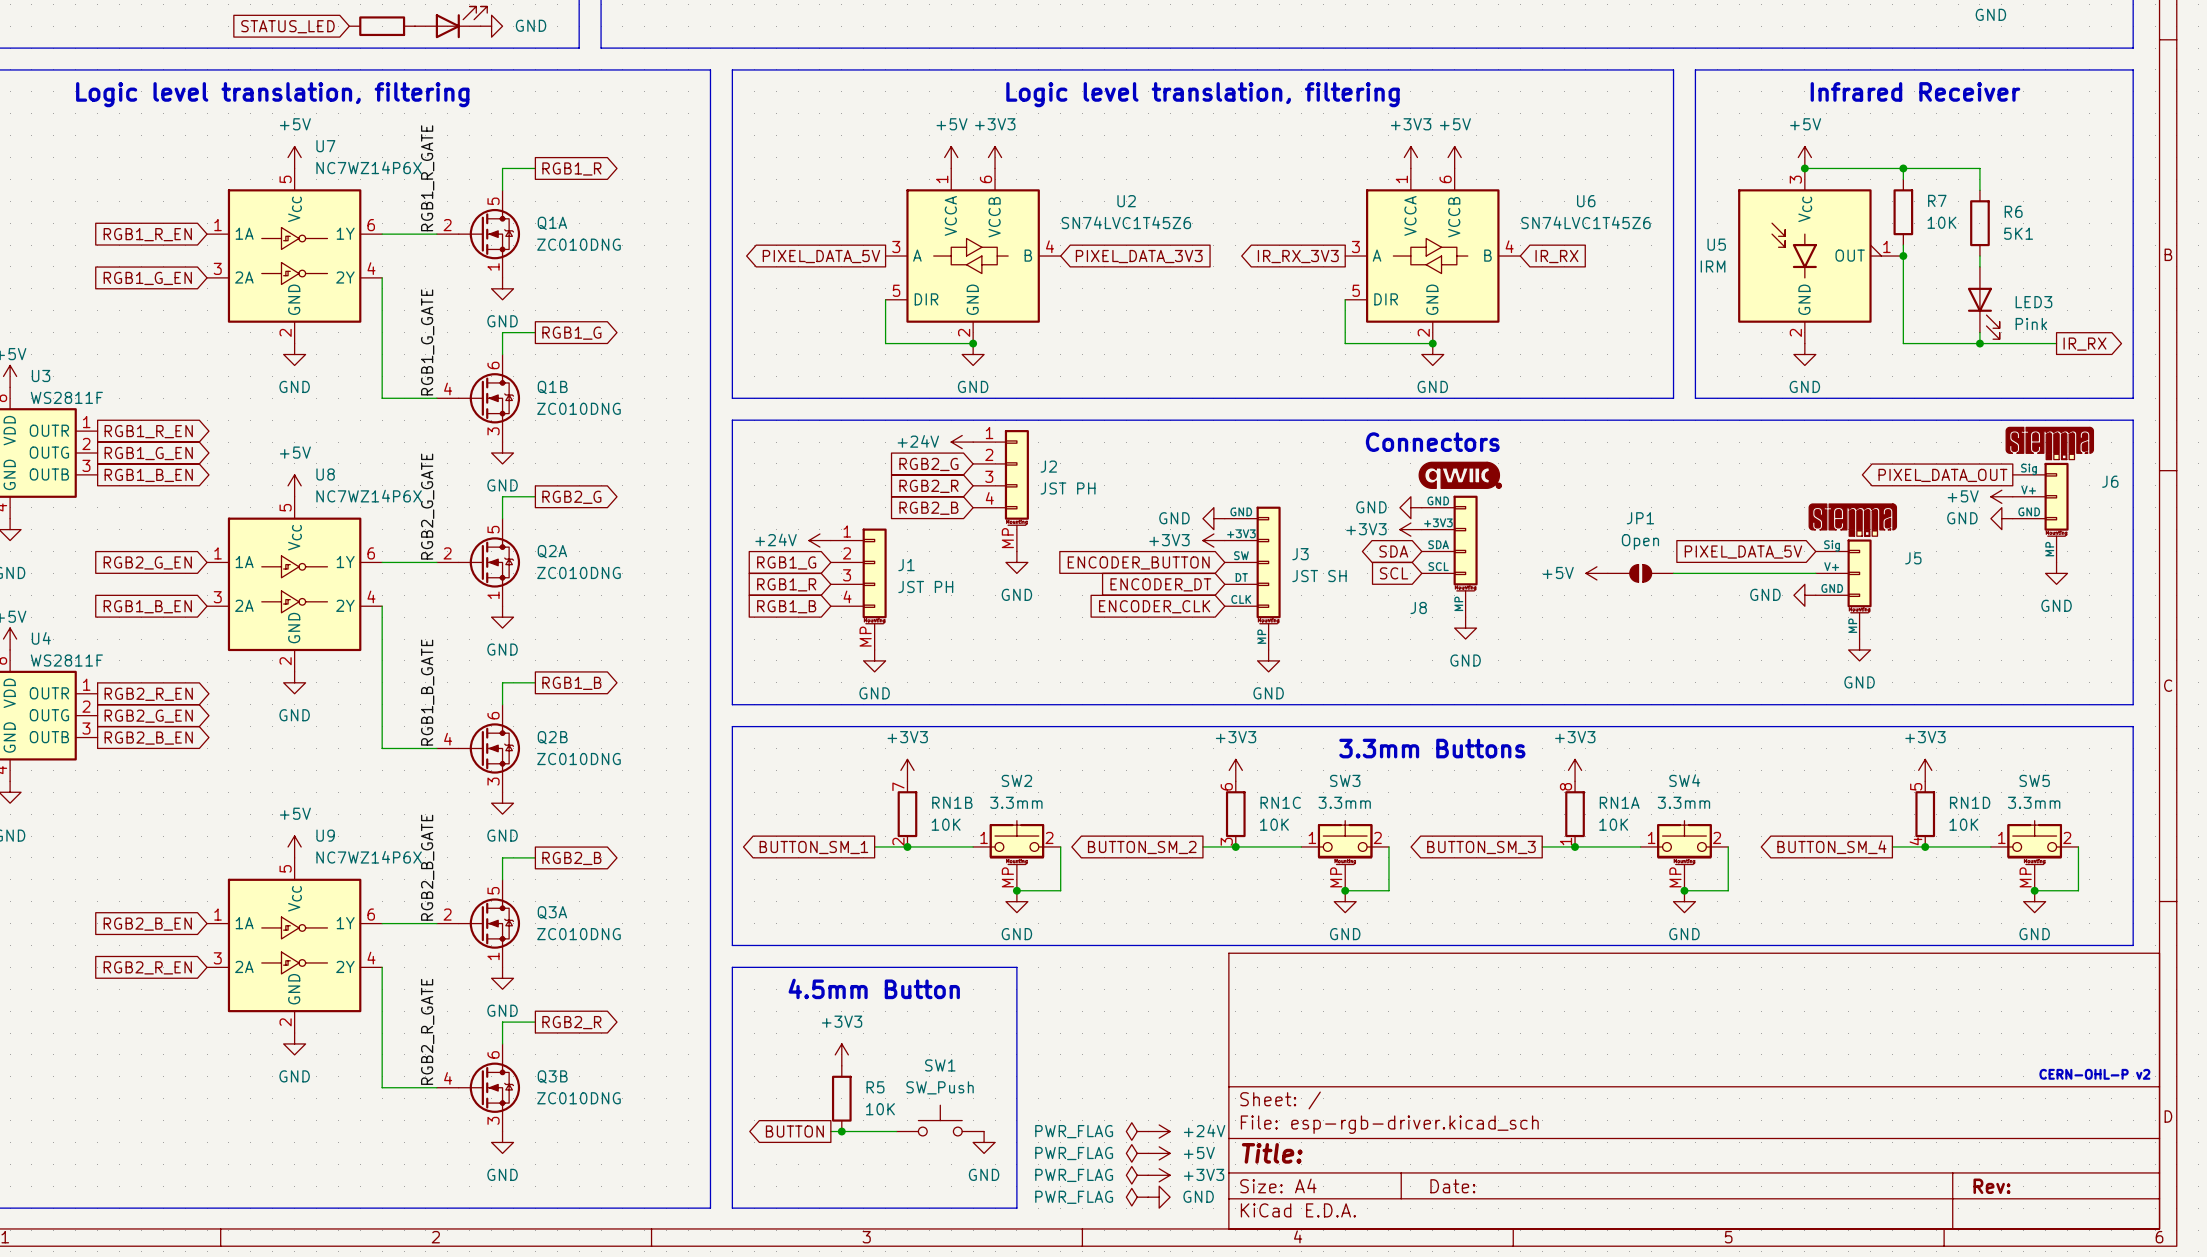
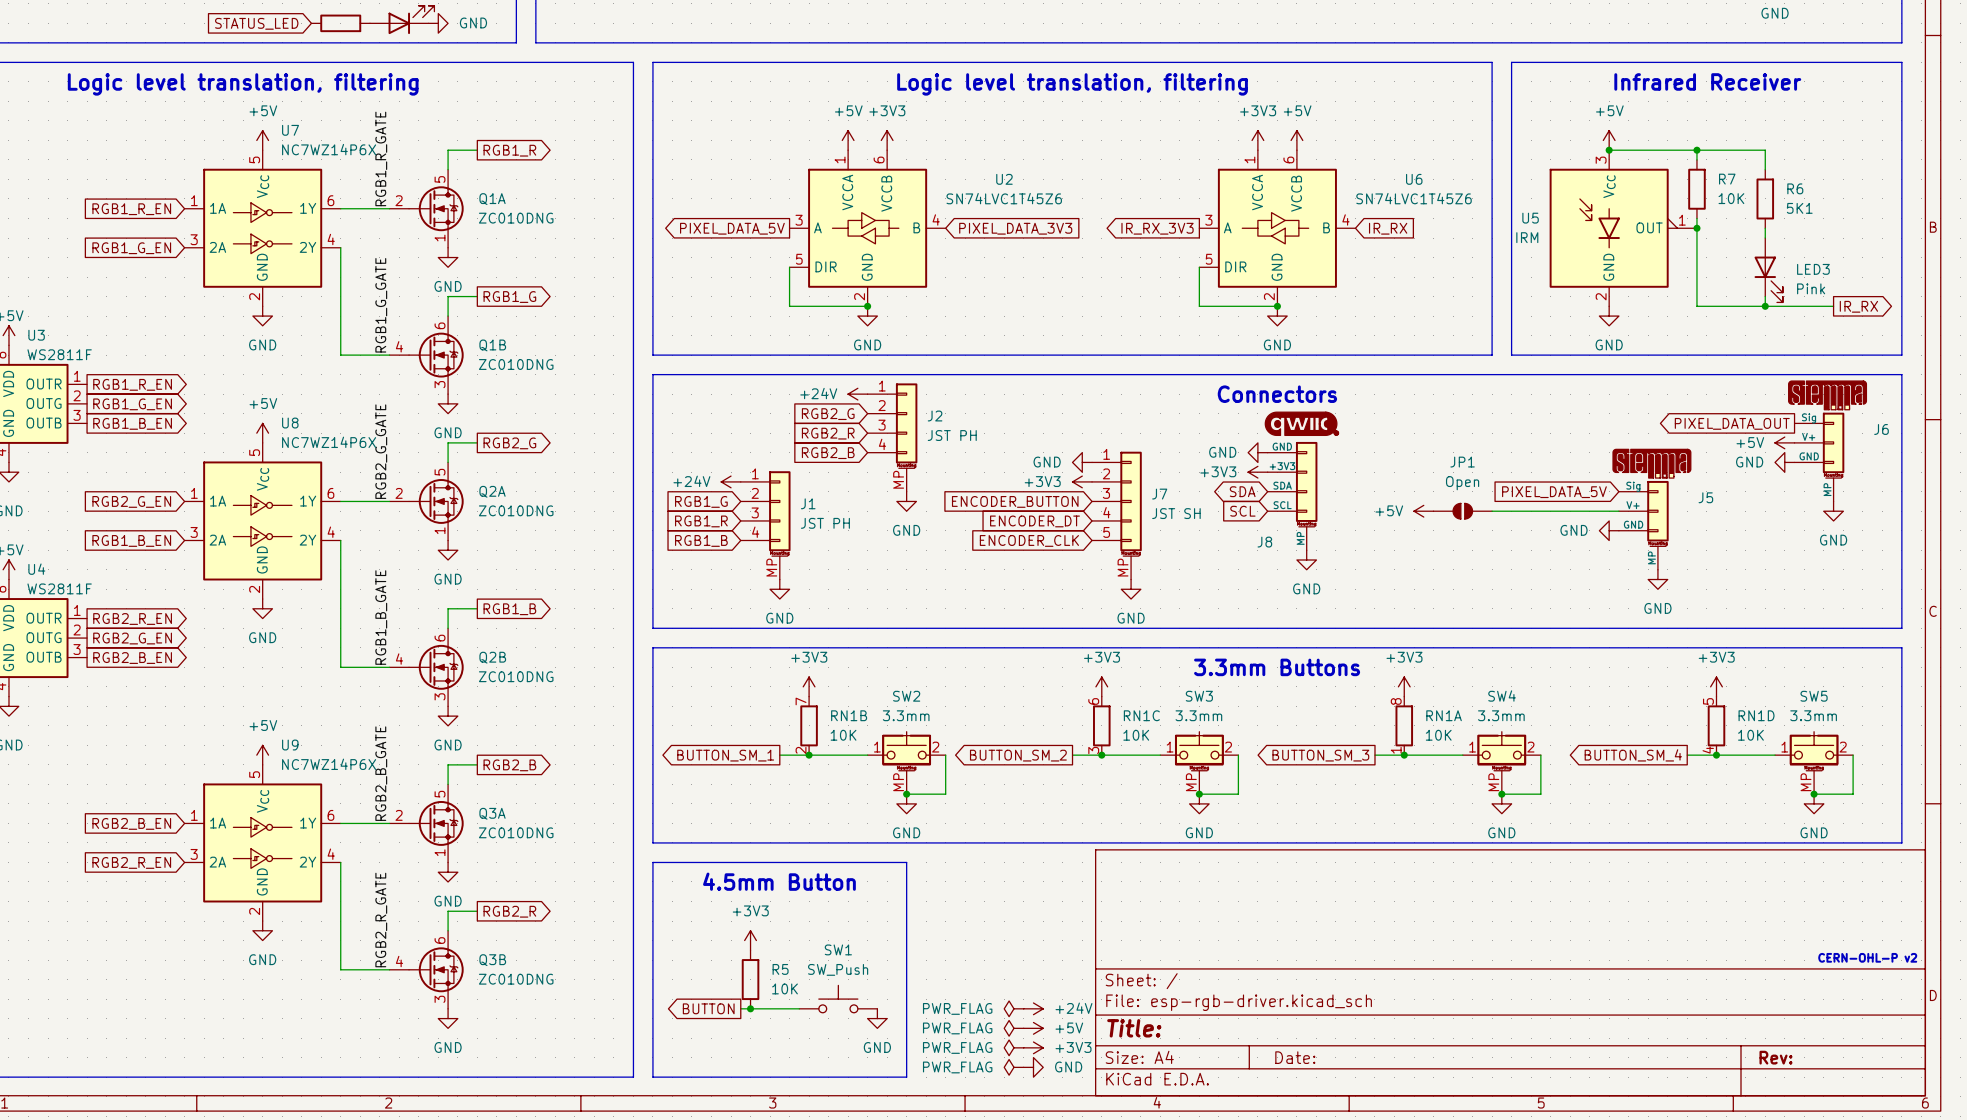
J3 symbol: [1224, 506, 1281, 650] -> [1092, 451, 1142, 580]
J3 name: J3 (1300, 554) -> J7 (1159, 494)

